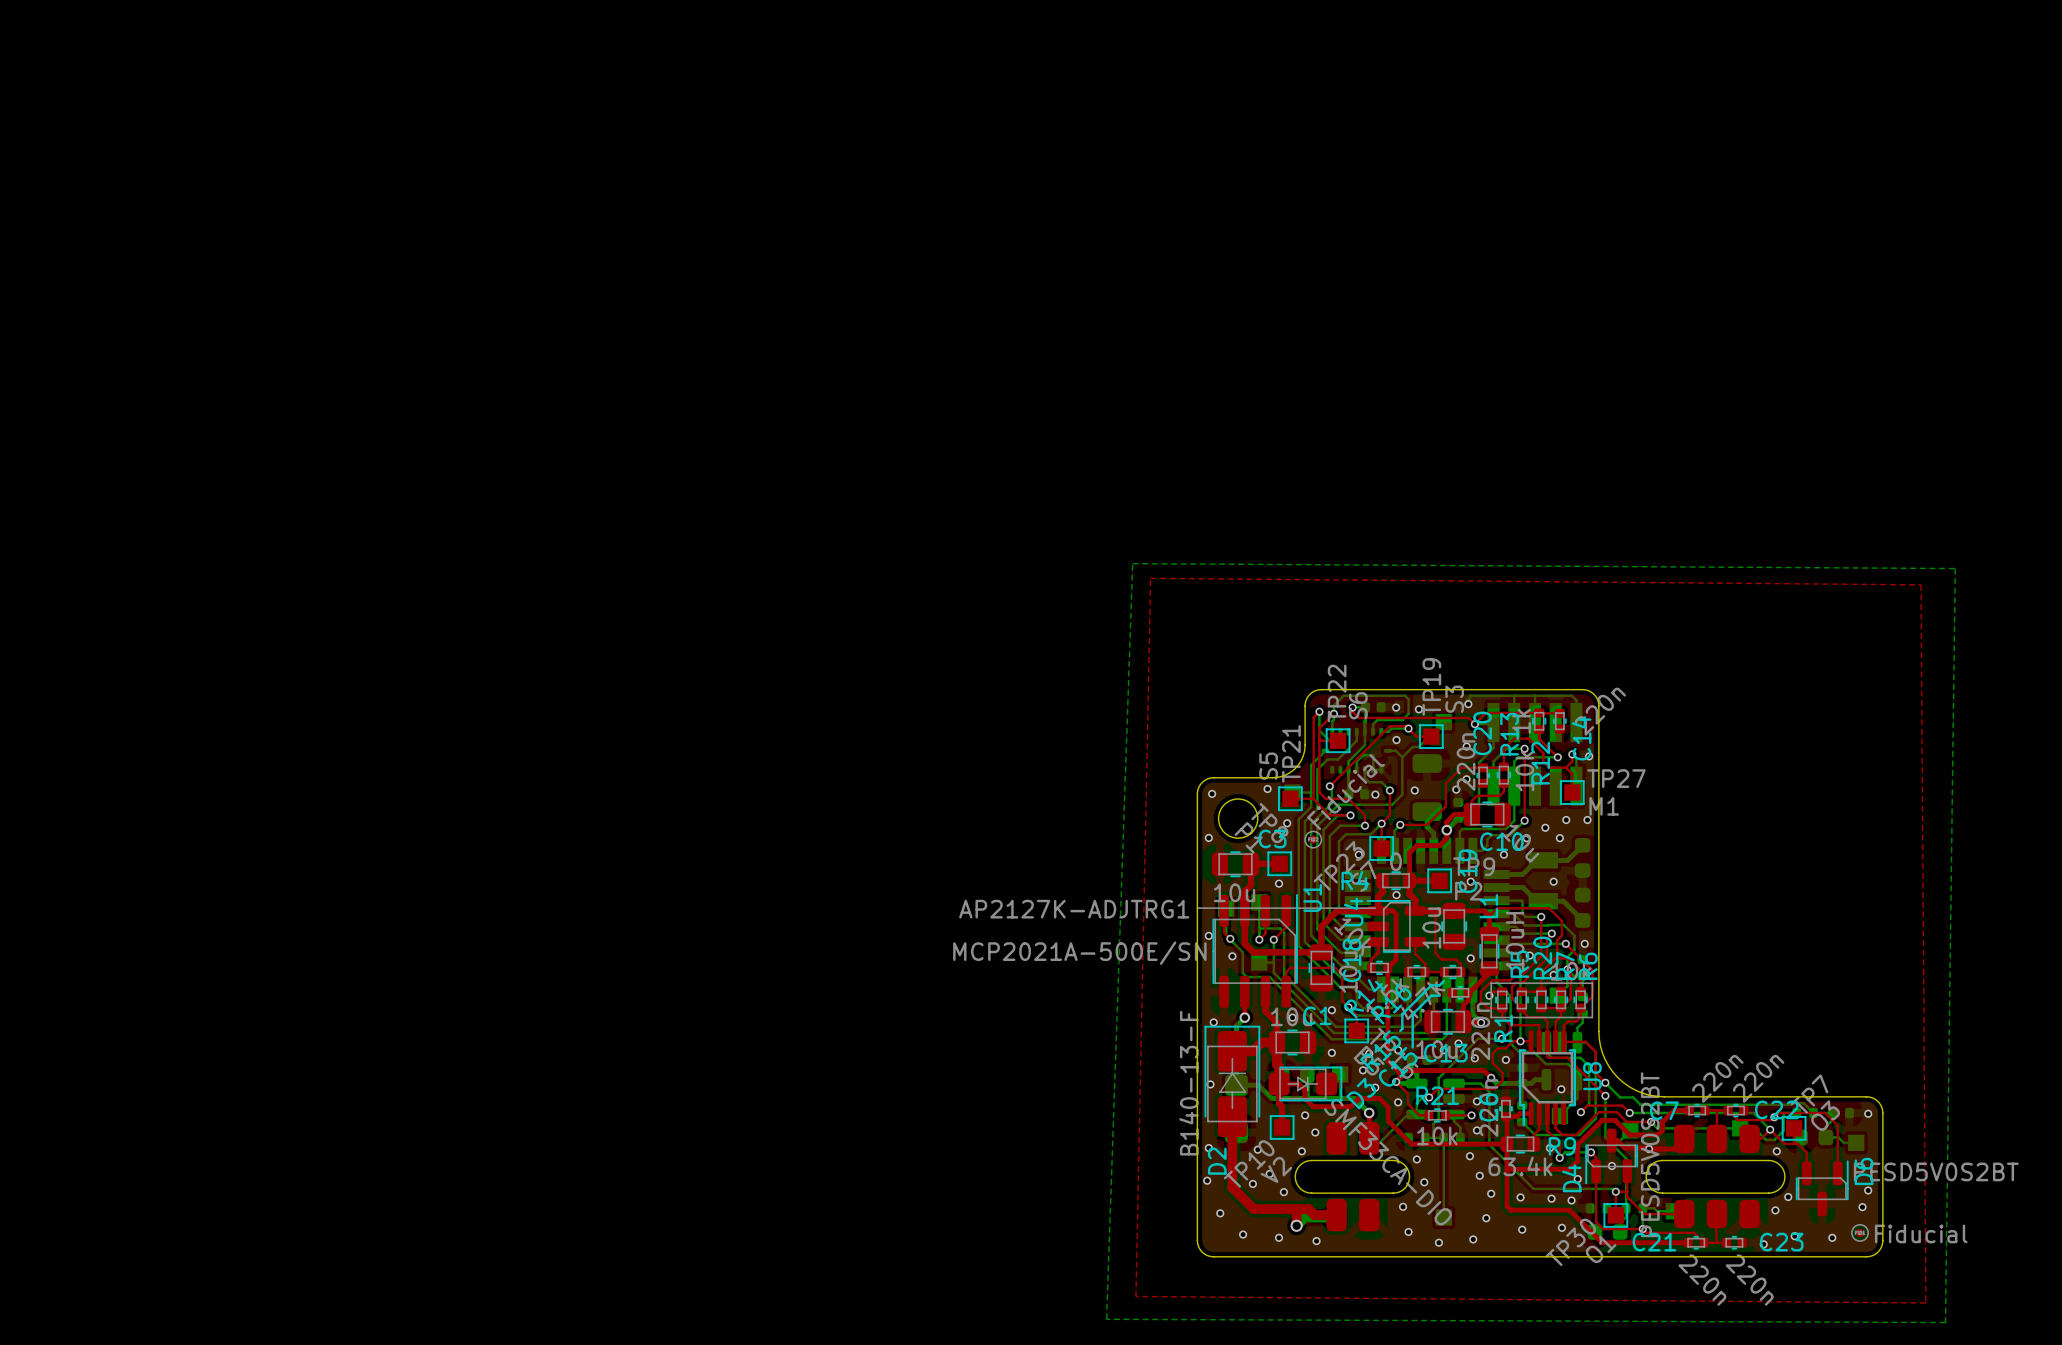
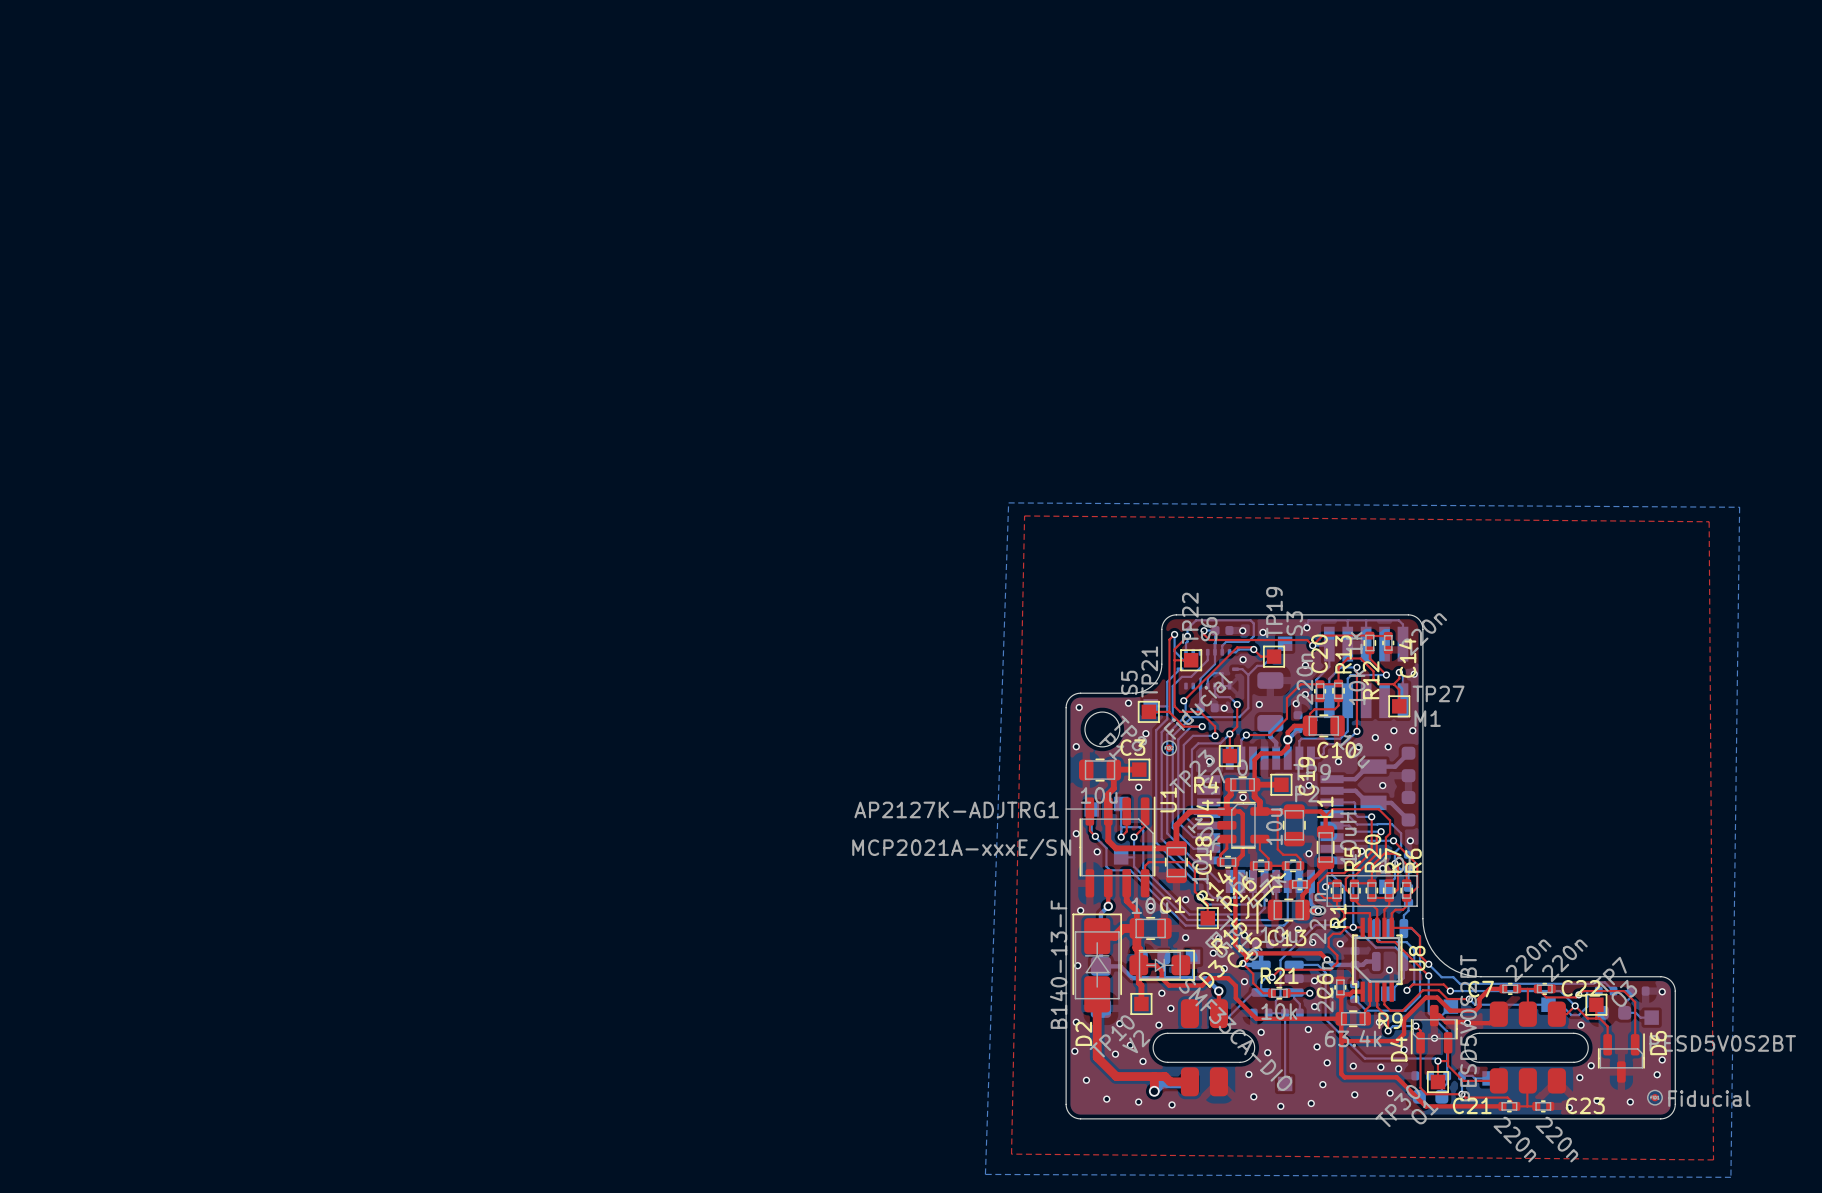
U1 value: MCP2021A-500E/SN (1079, 953) -> MCP2021A-xxxE/SN (961, 849)

